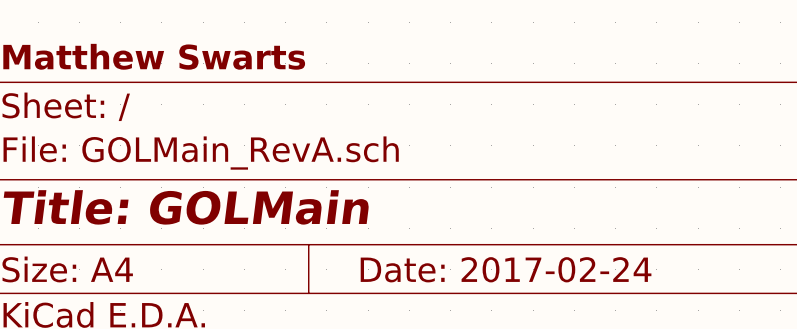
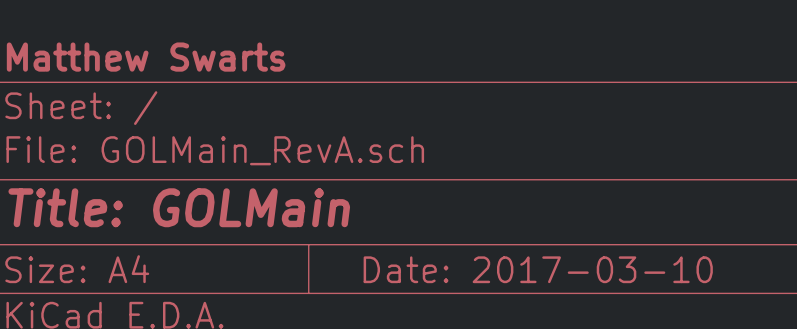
title block: Date: 2017-02-24 (506, 269) -> Date: 2017-03-10 (538, 269)

